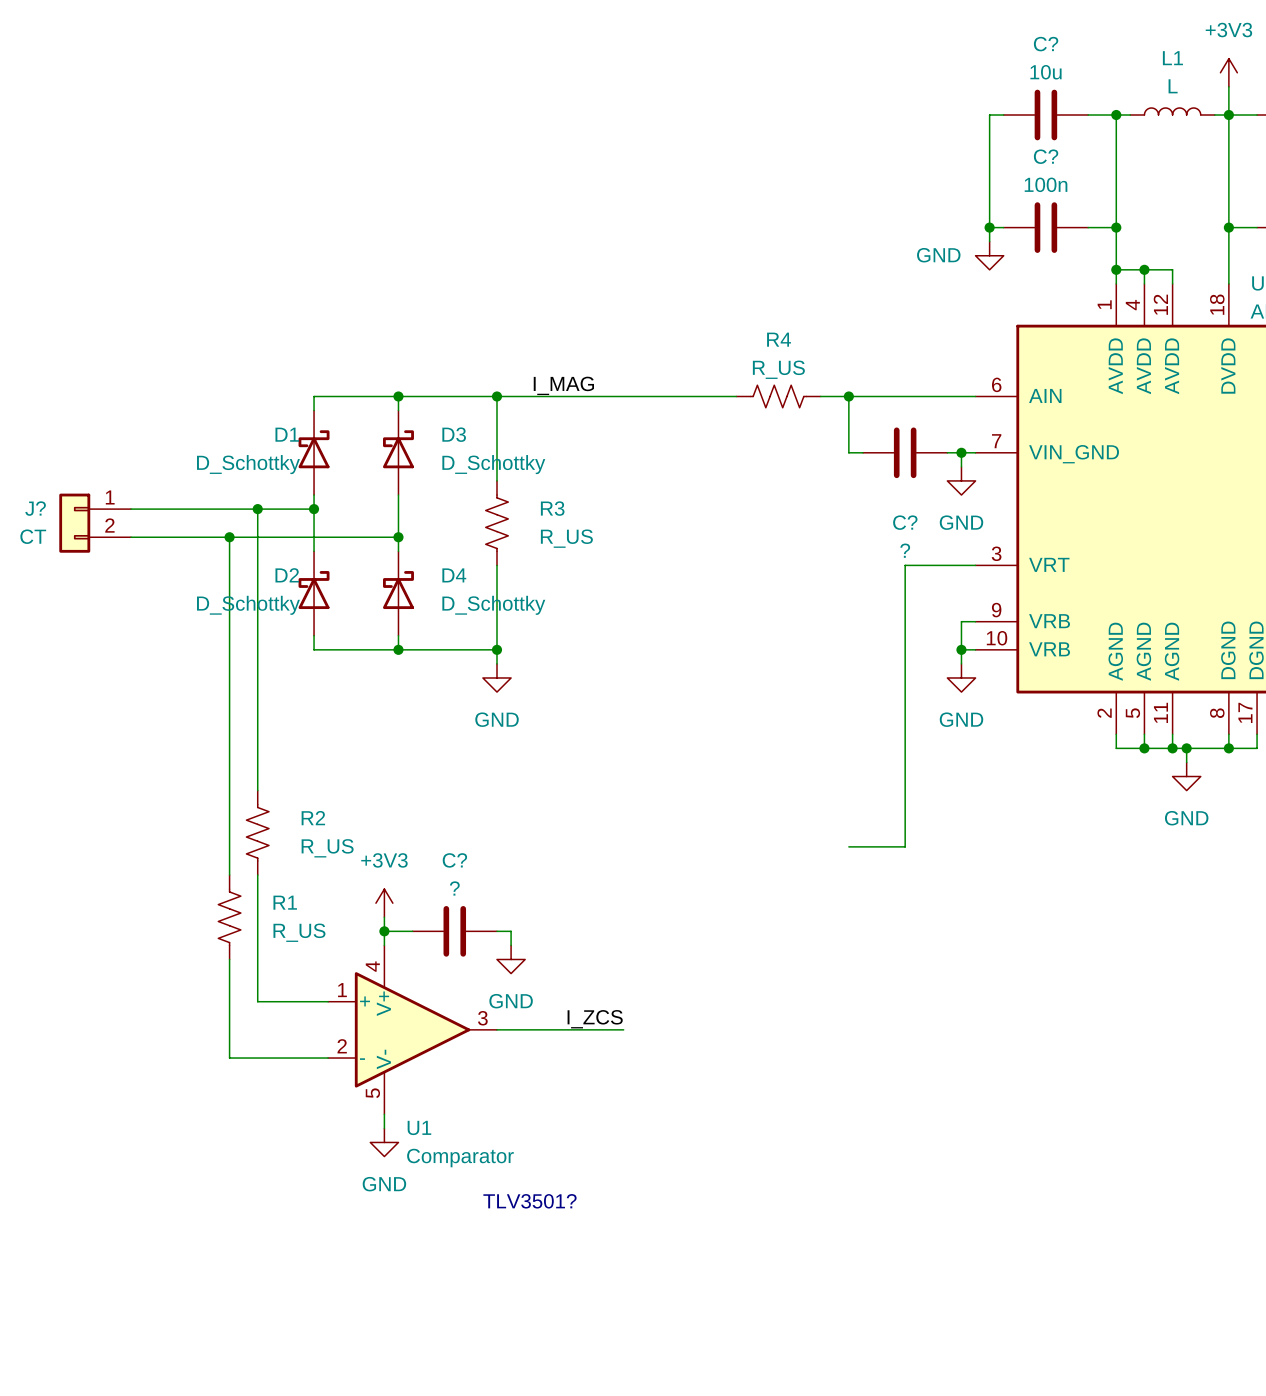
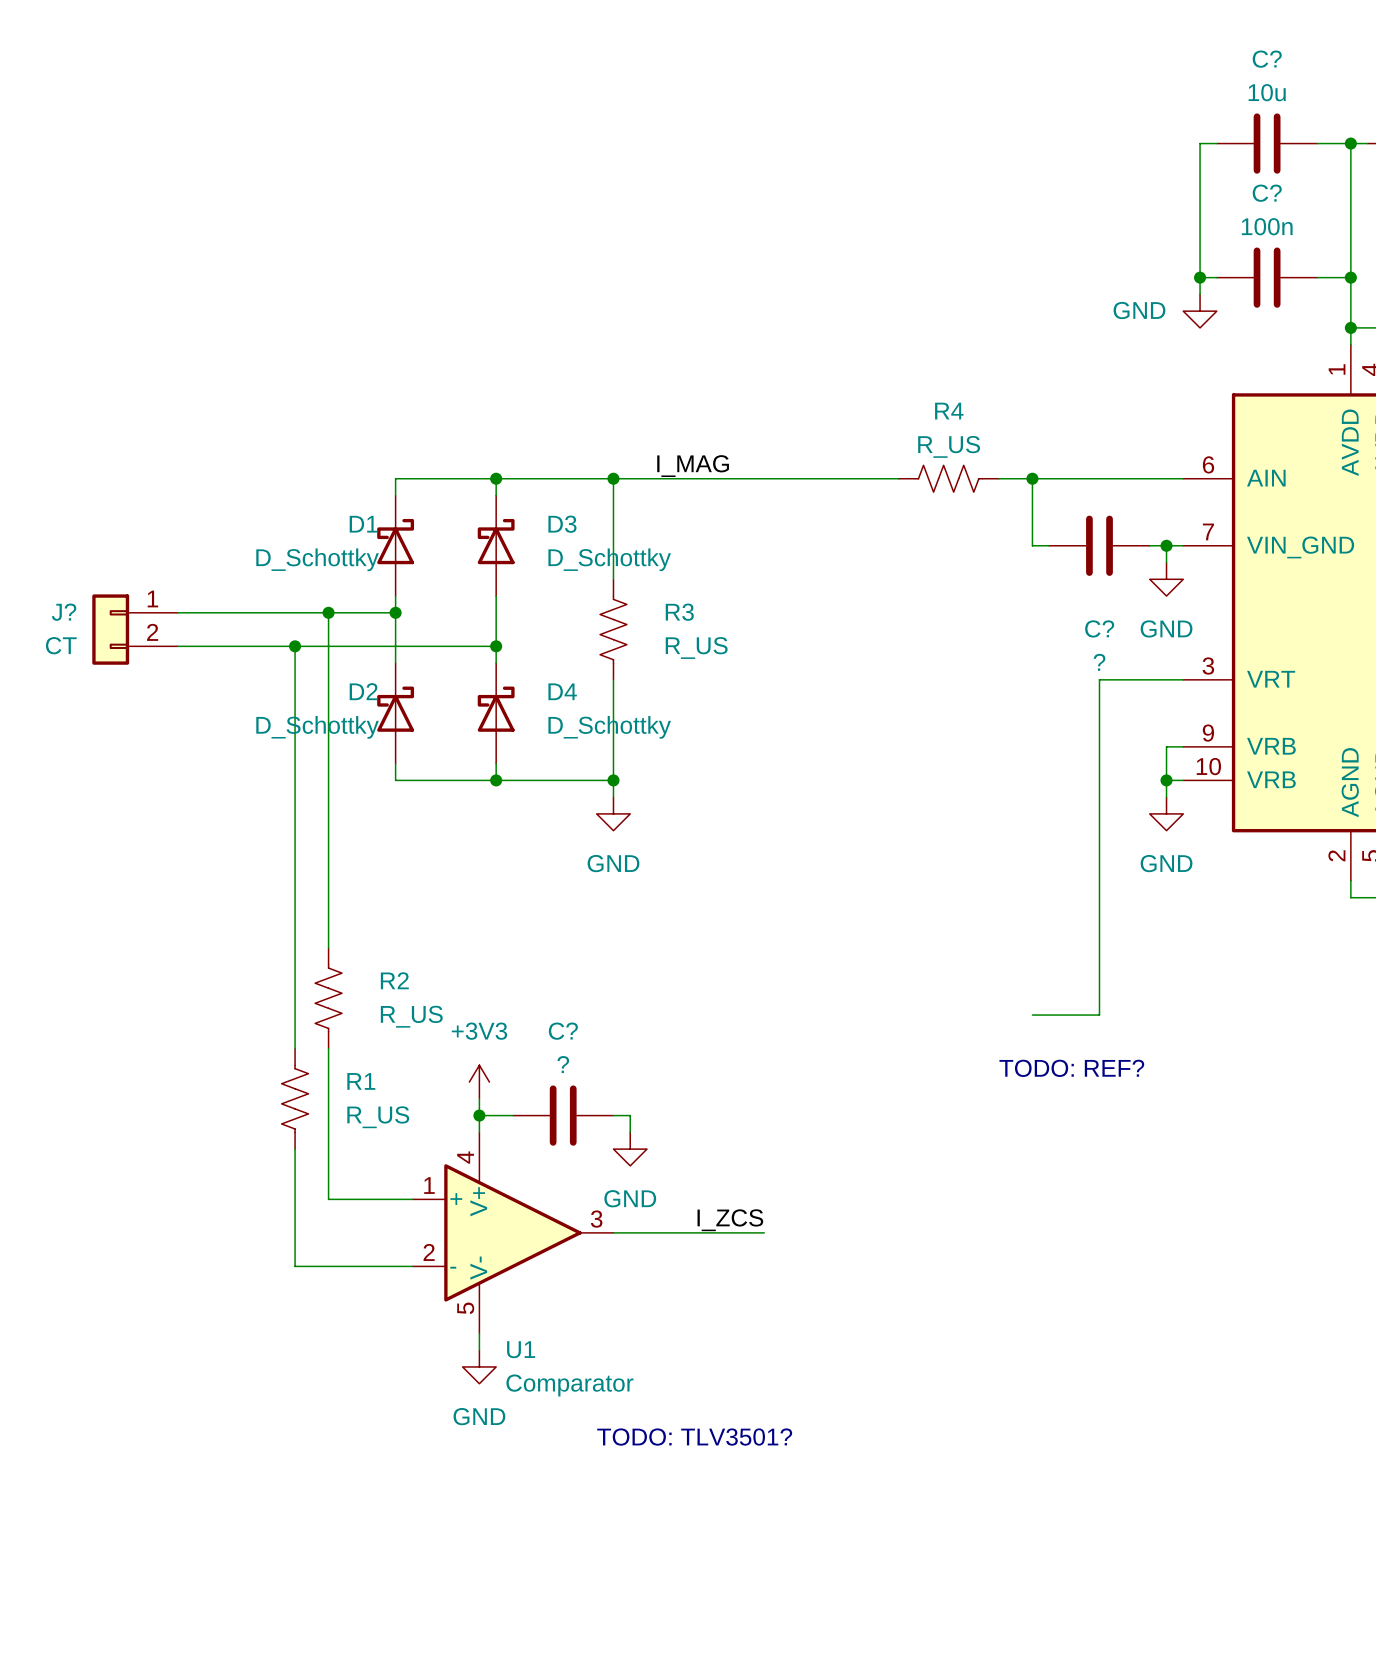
text: none -> TODO: REF? (1071, 1068)
text: TLV3501? (529, 1201) -> TODO: TLV3501? (694, 1437)

